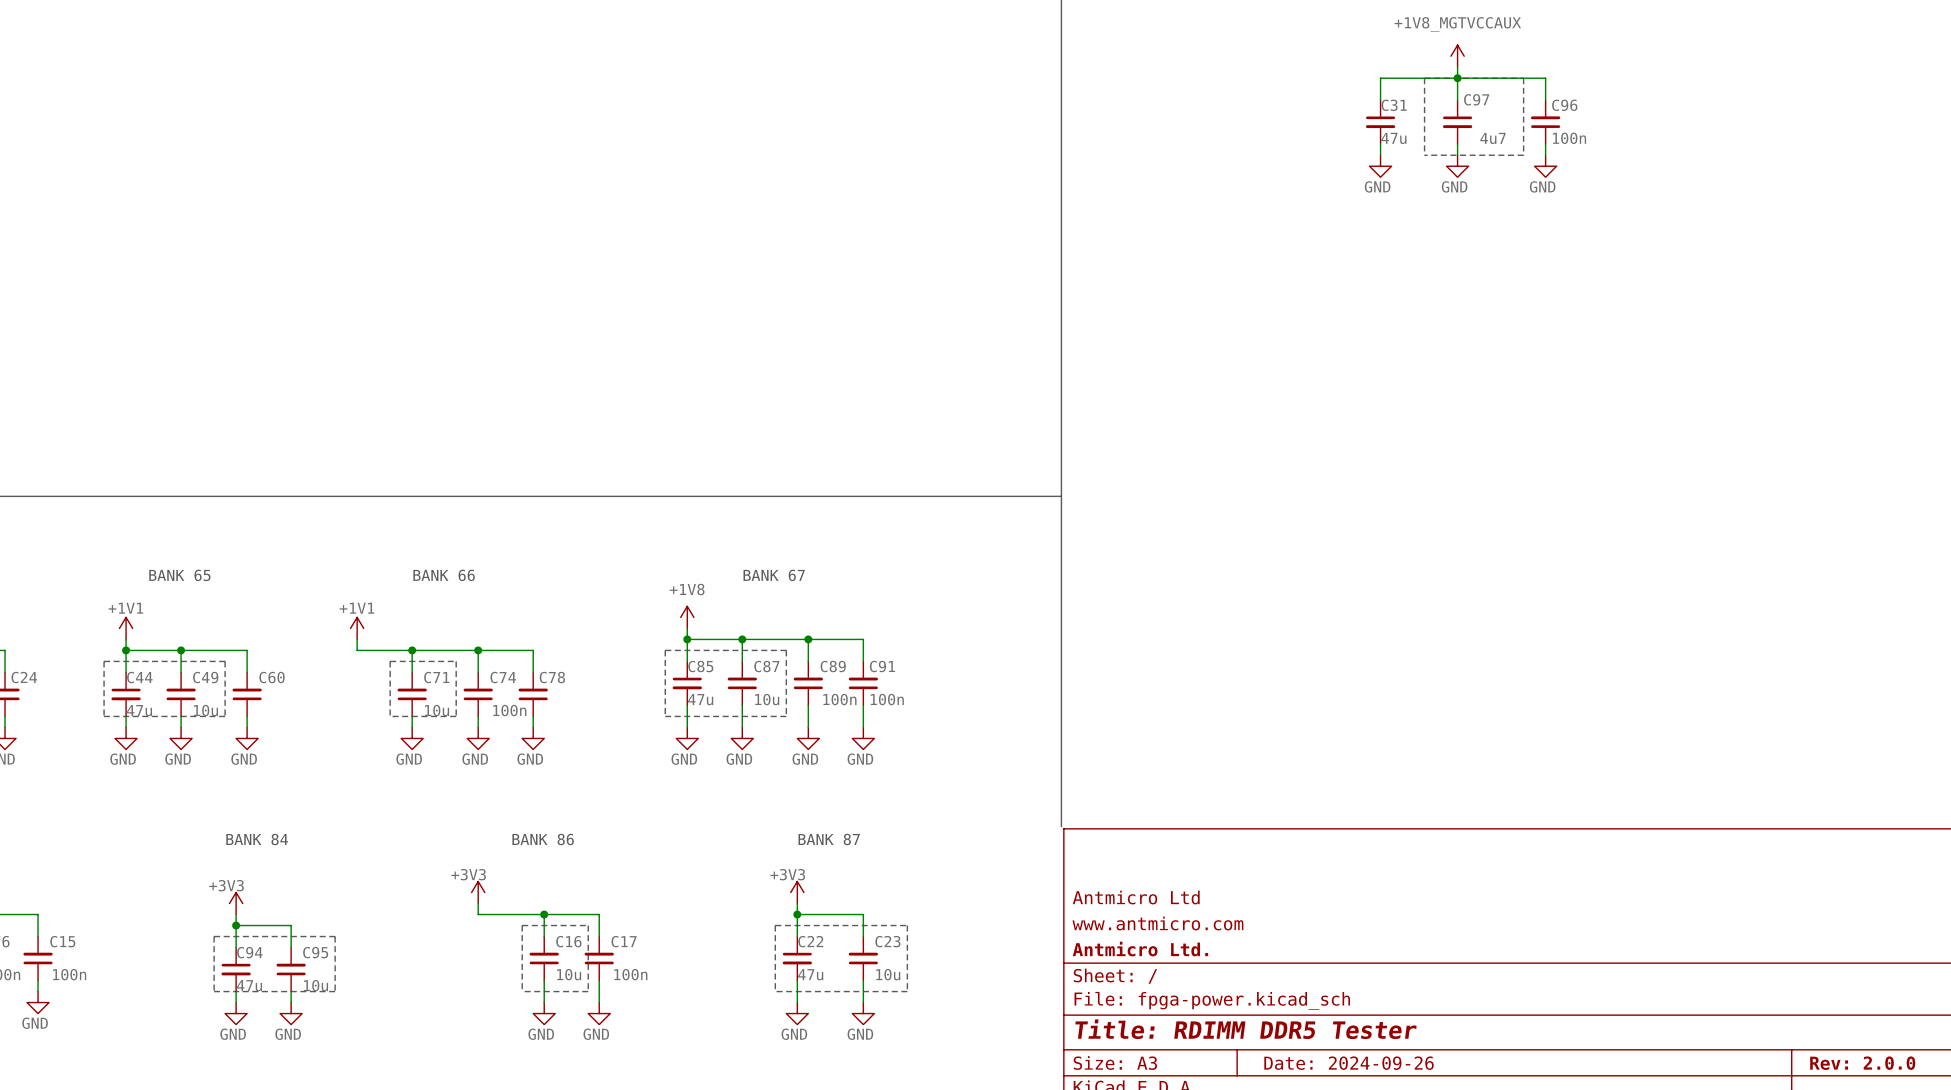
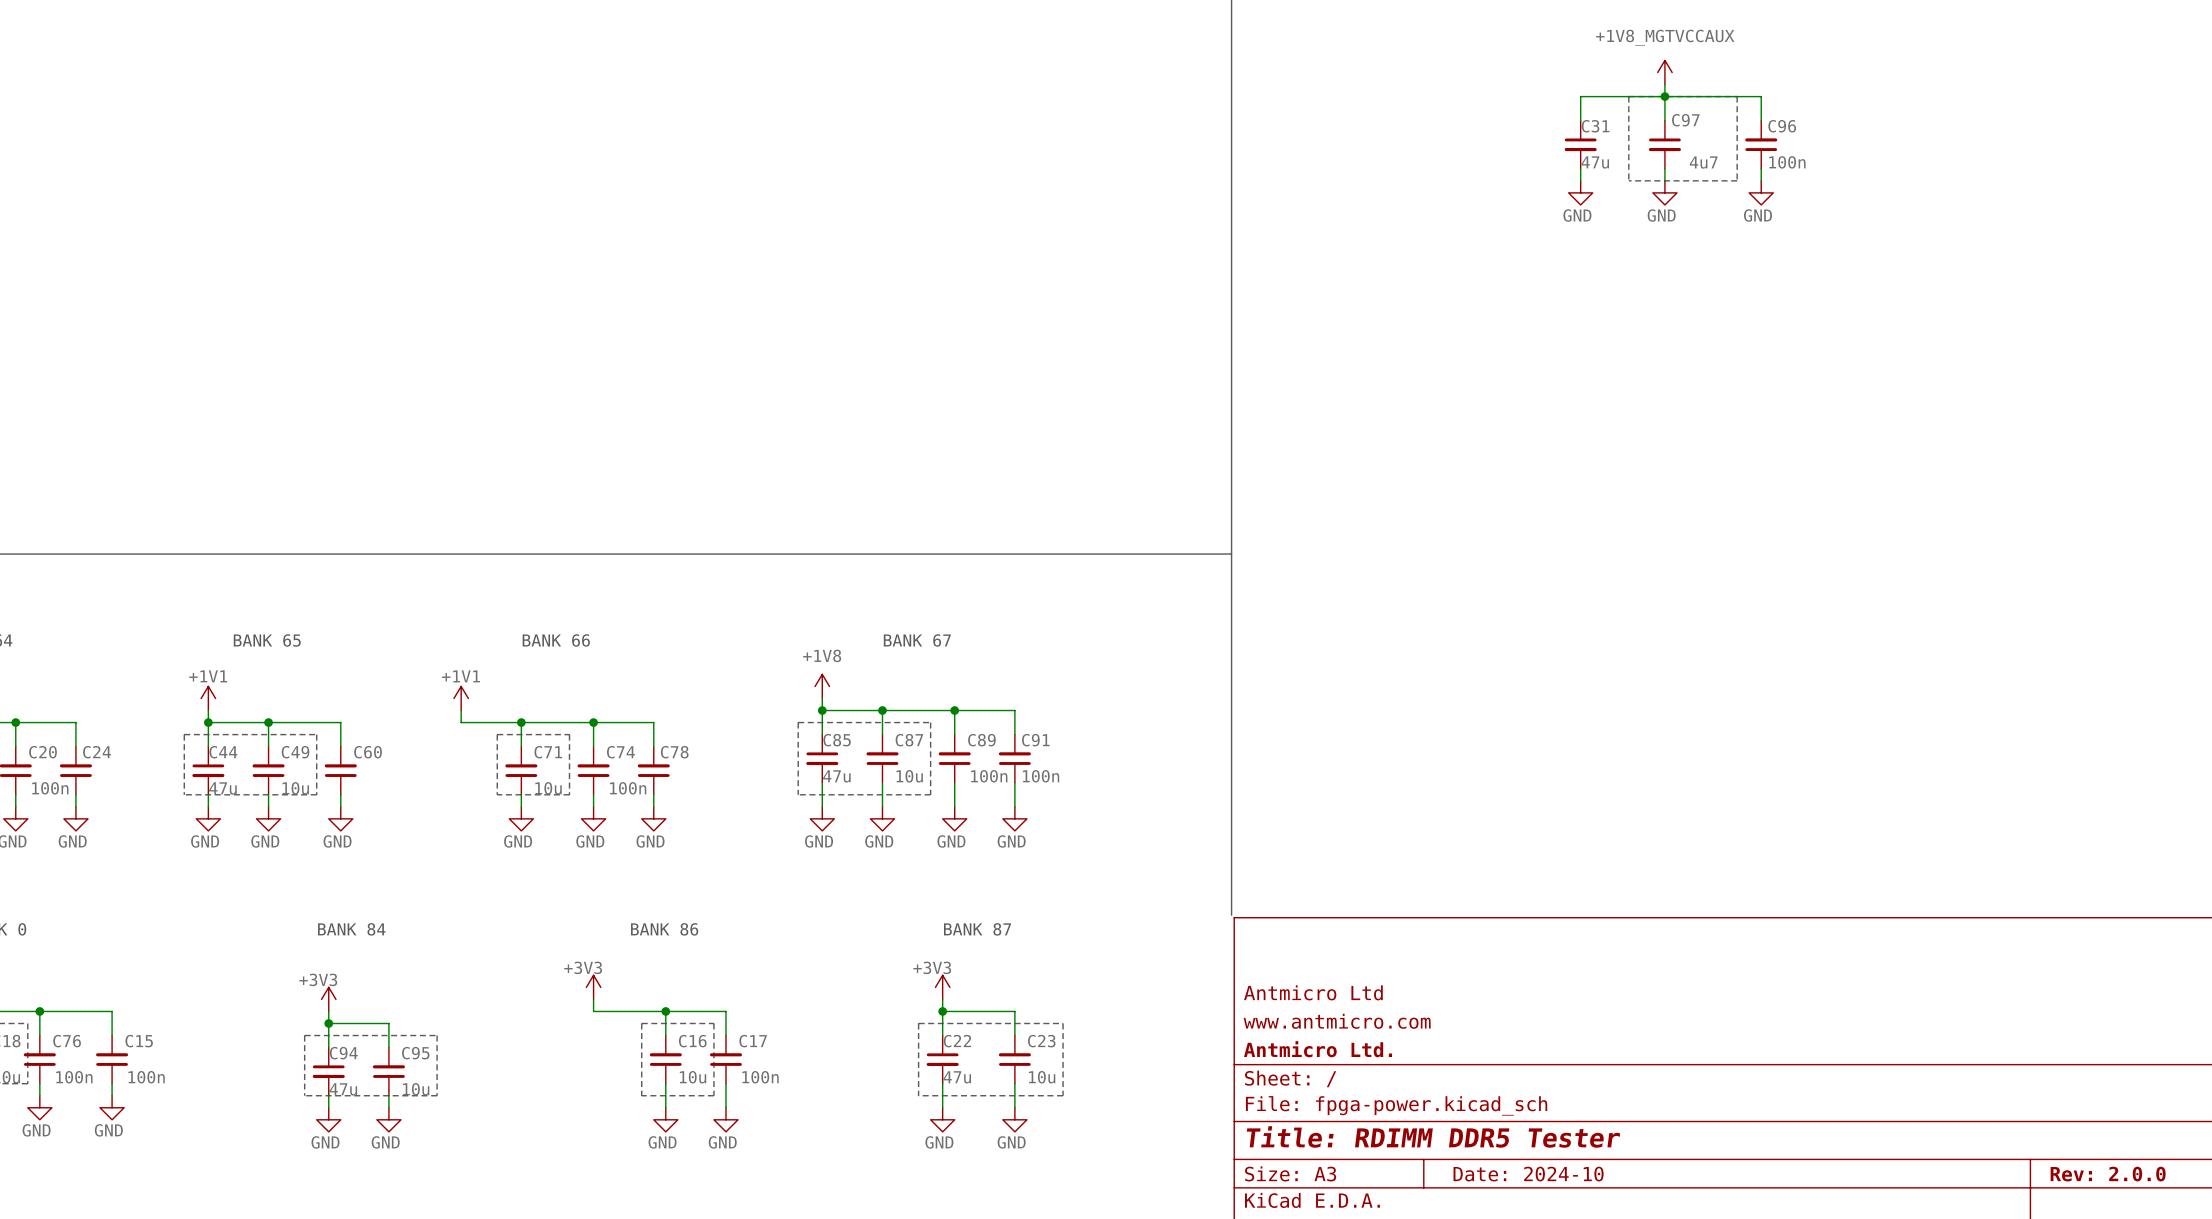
title block: Date: 2024-09-26 (1349, 1063) -> Date: 2024-10 (1528, 1174)

